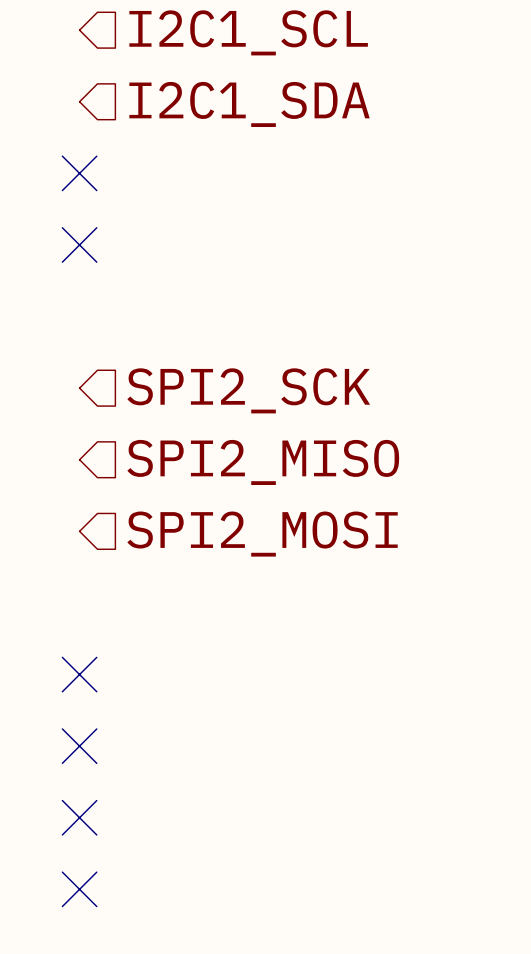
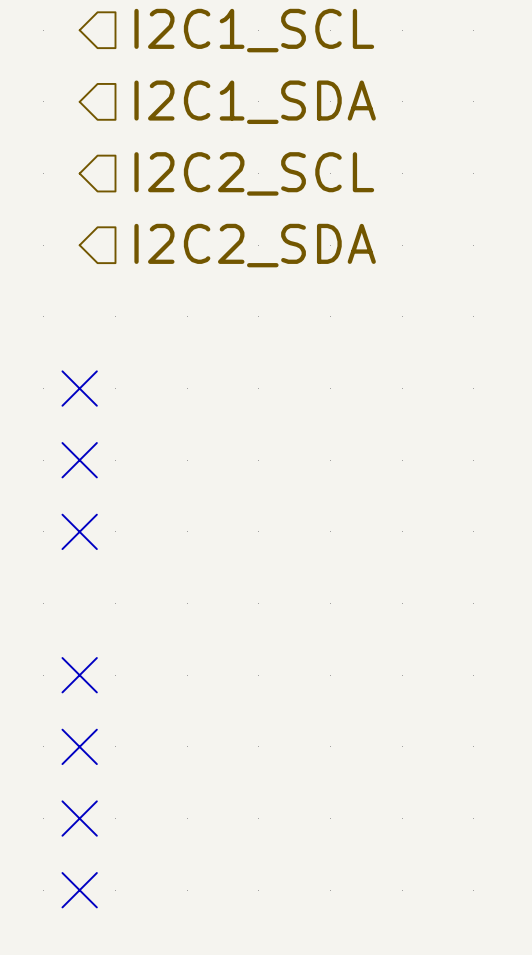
no-connect mark: (79, 173) -> none
hierarchical label: none -> I2C2_SCL (254, 173)
no-connect mark: (79, 244) -> none
hierarchical label: none -> I2C2_SDA (255, 245)
no-connect mark: none -> (79, 388)
hierarchical label: SPI2_SCK (248, 390) -> none
no-connect mark: none -> (79, 460)
hierarchical label: SPI2_MISO (263, 462) -> none
no-connect mark: none -> (79, 531)
hierarchical label: SPI2_MOSI (262, 534) -> none

